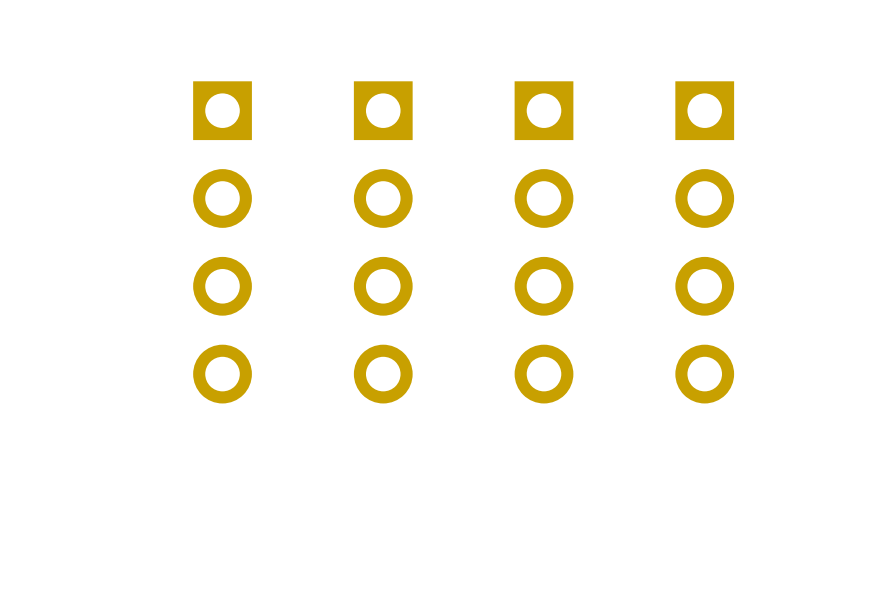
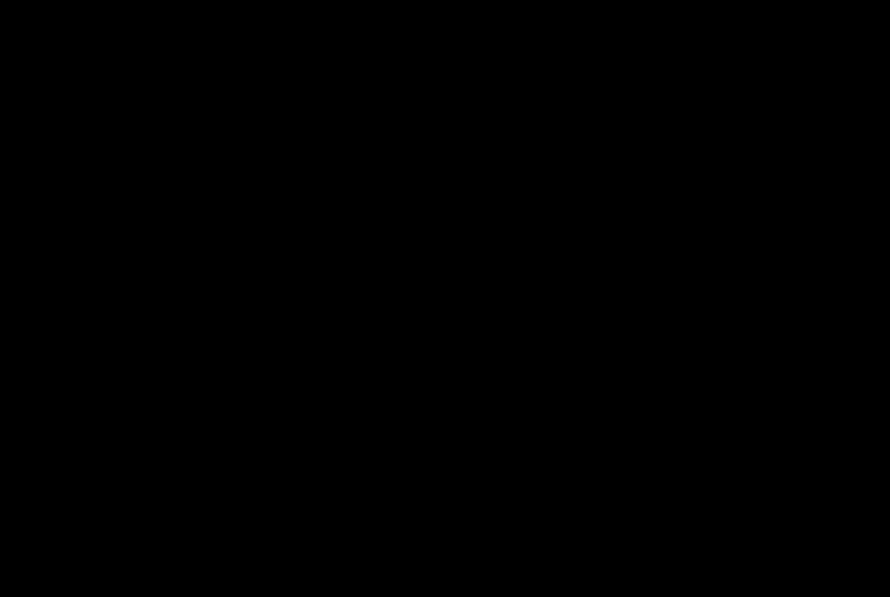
part: (222, 242) -> none
part: (383, 242) -> none
part: (543, 242) -> none
part: (704, 242) -> none

